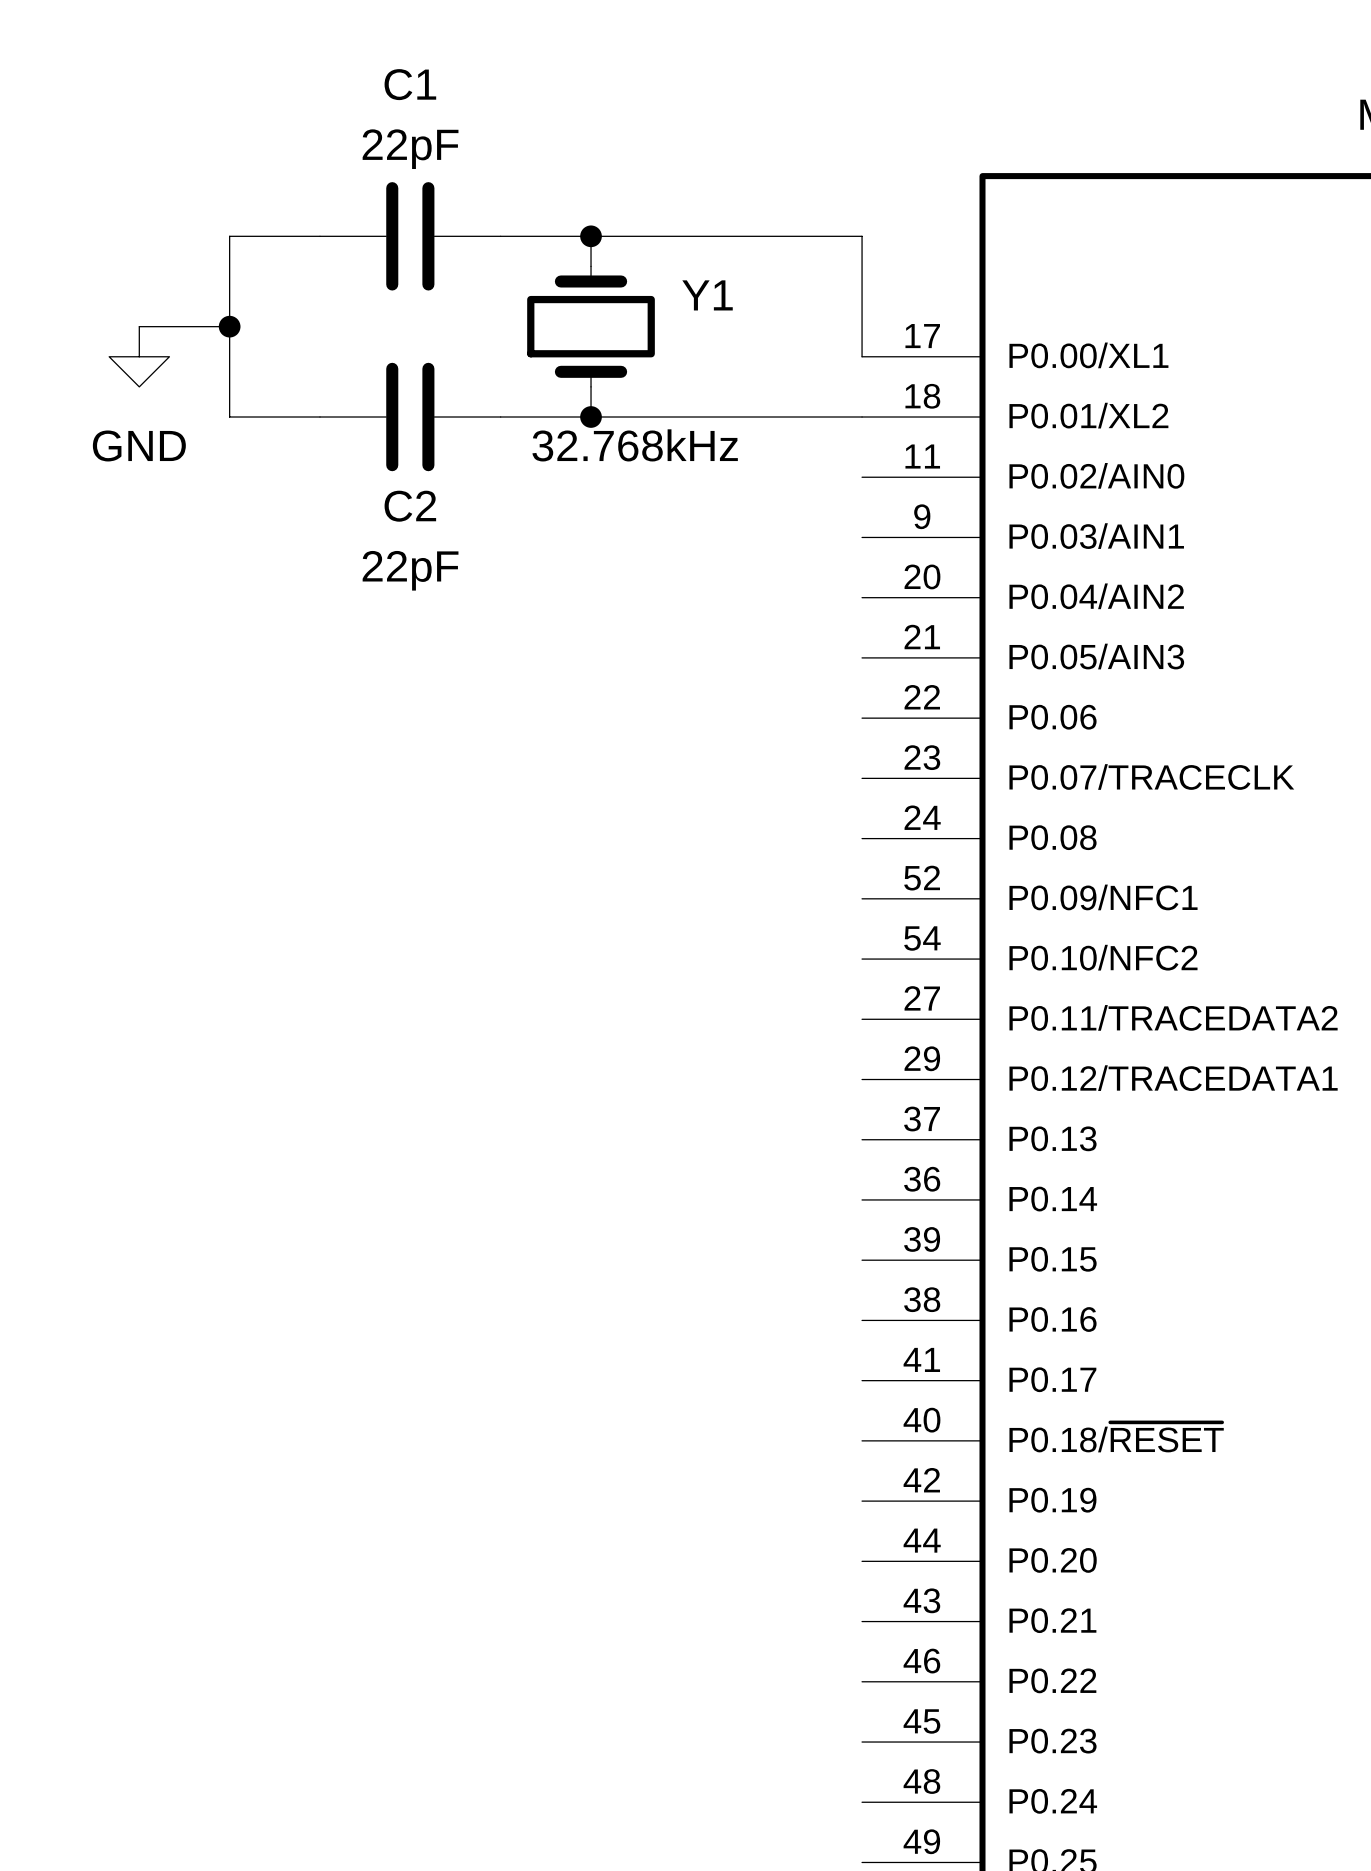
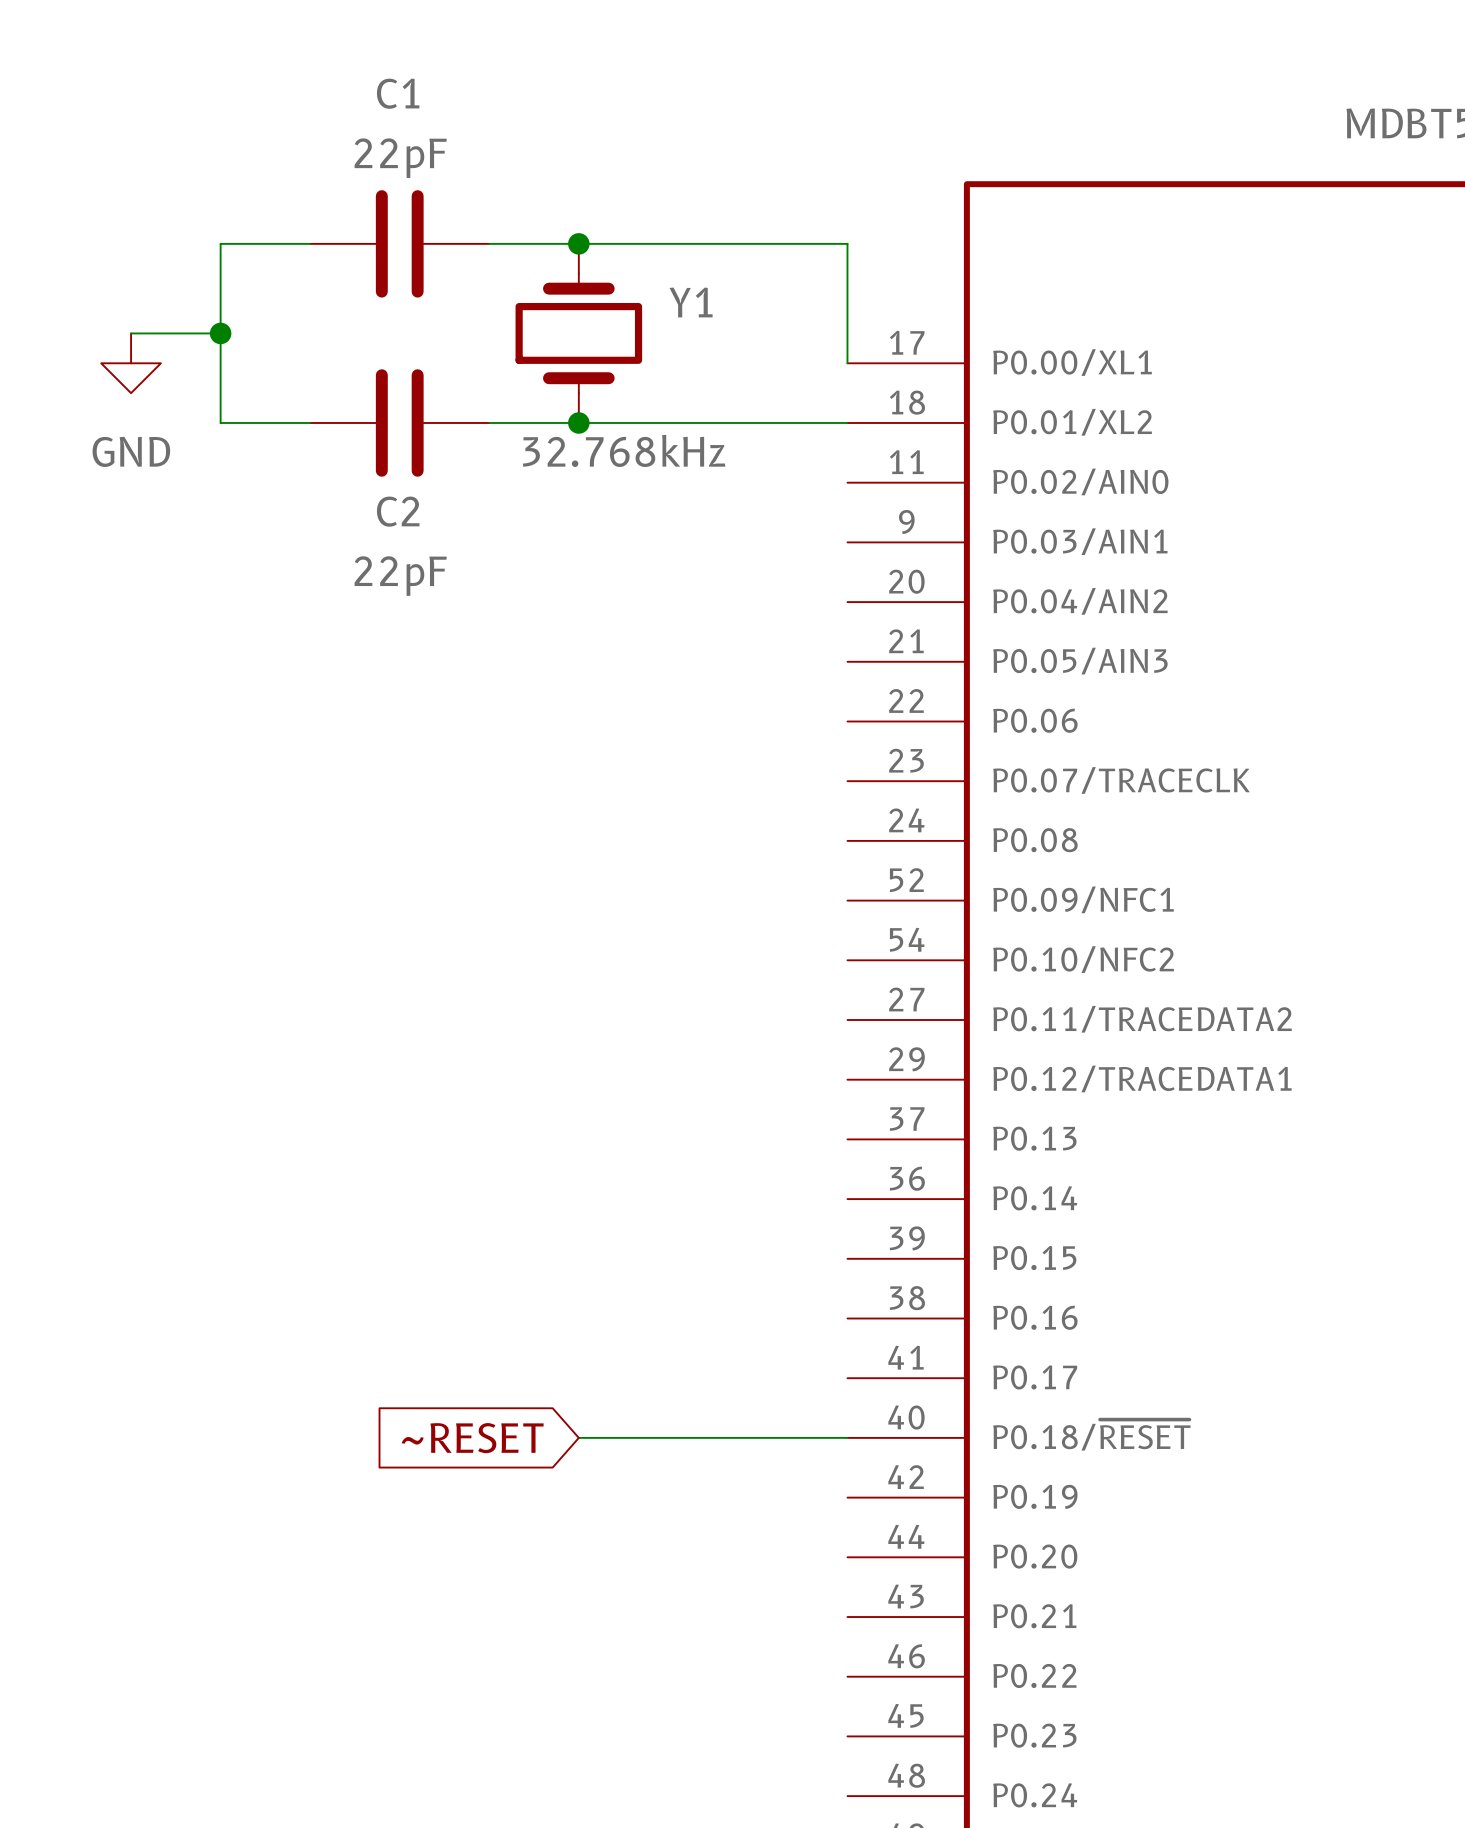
global label: none -> ~RESET (472, 1438)
wire: none -> (578, 1437) (847, 1437)

